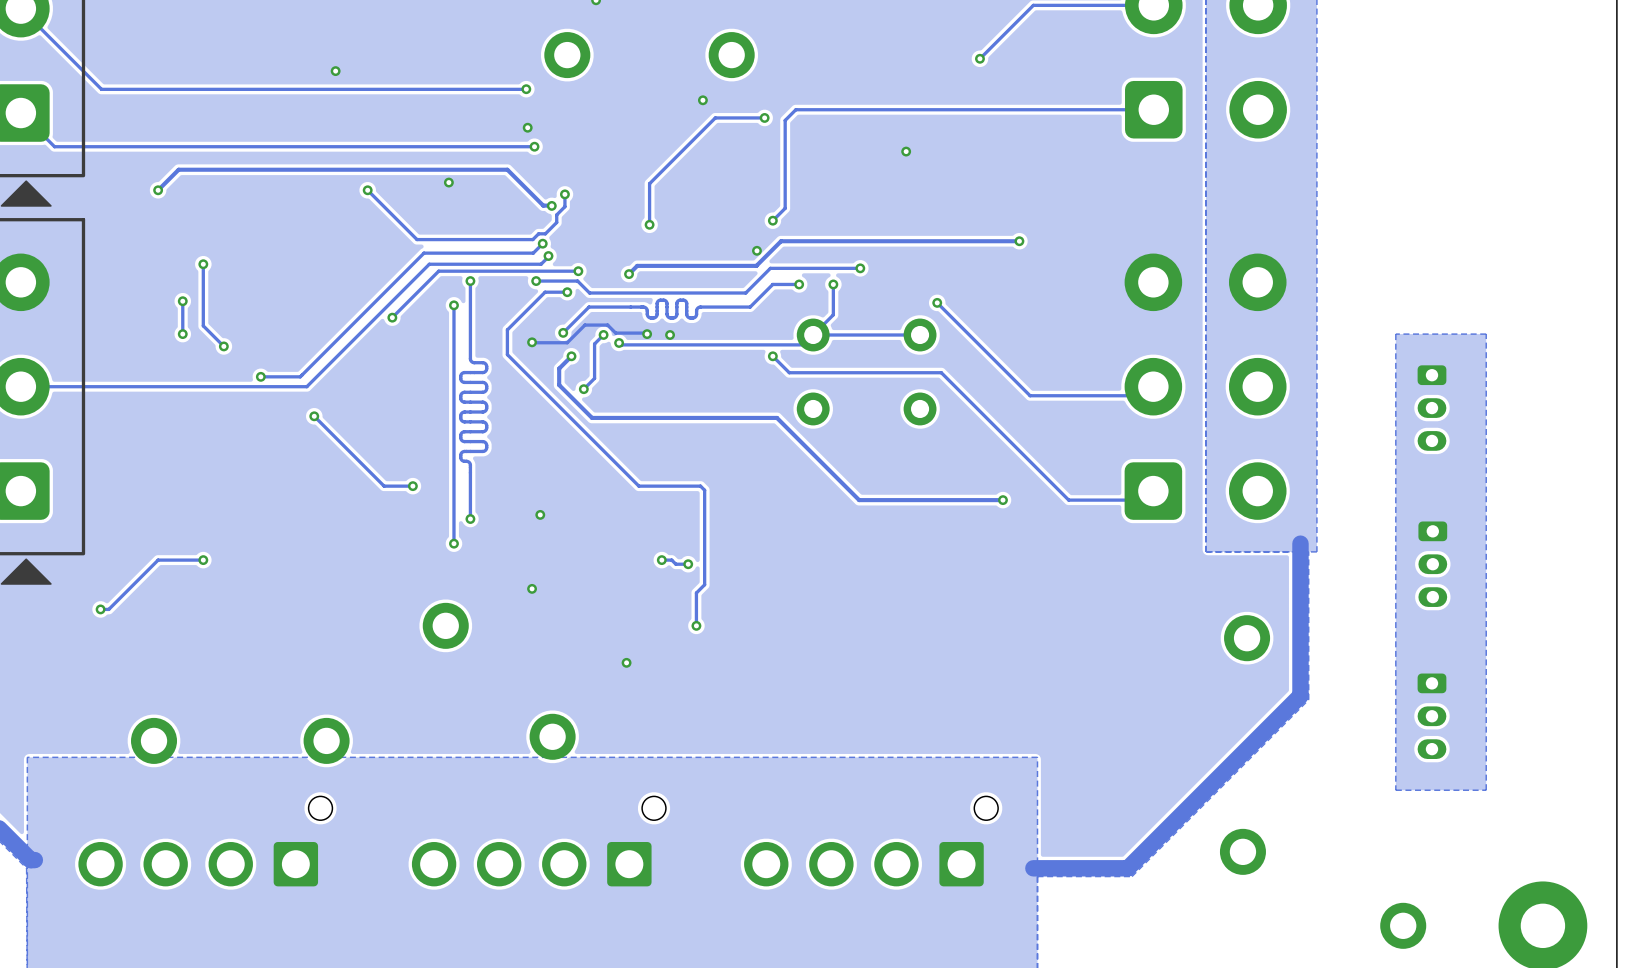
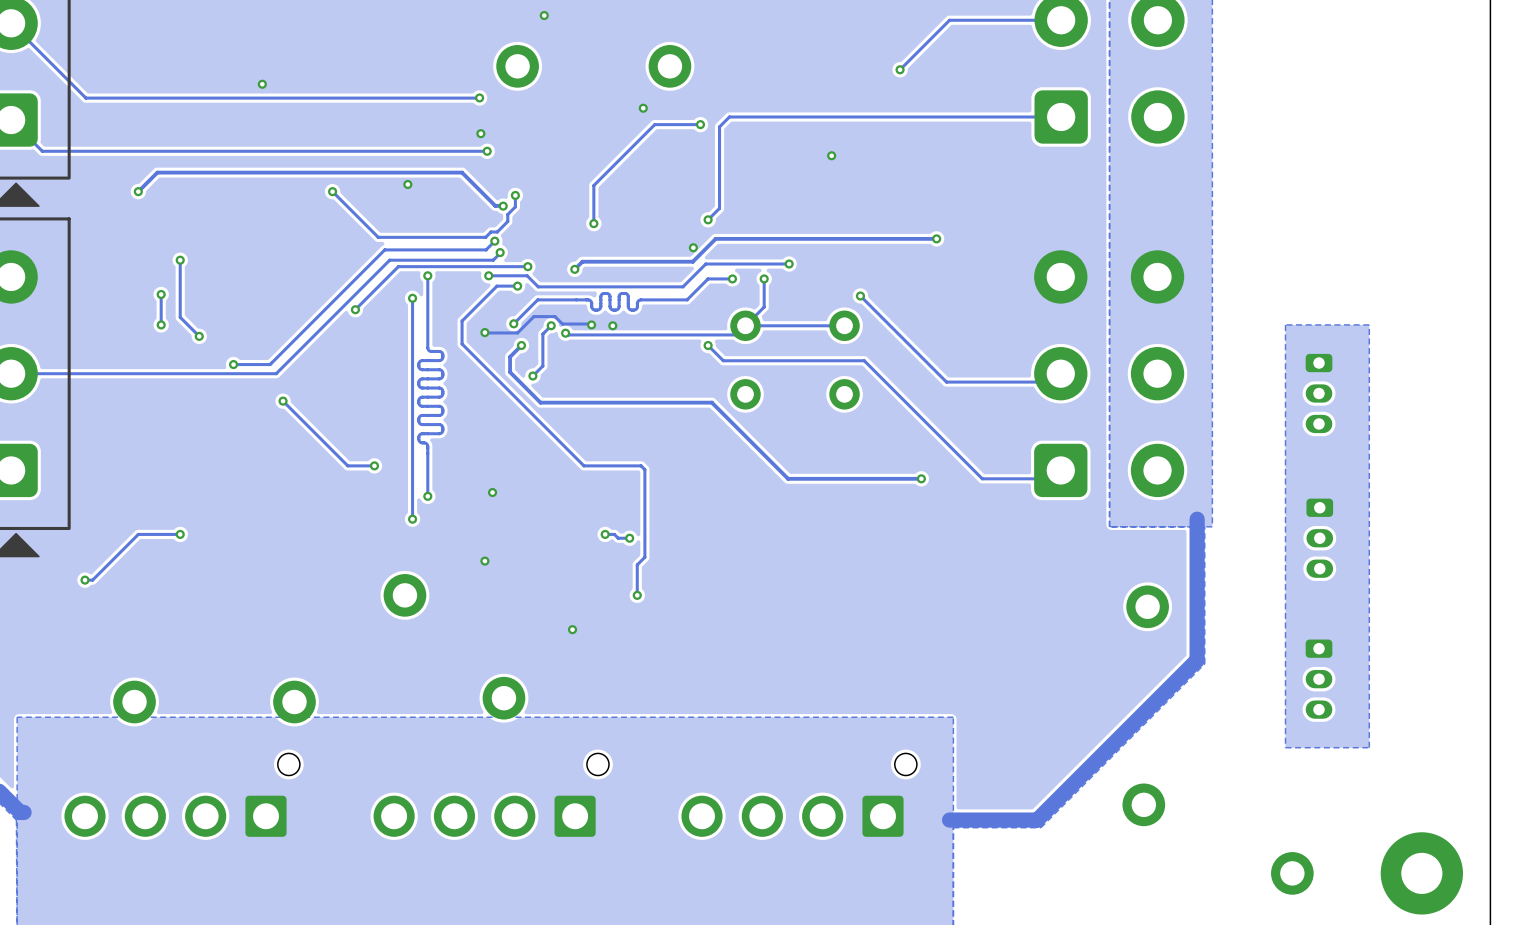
via position: (335, 71) -> (262, 84)

